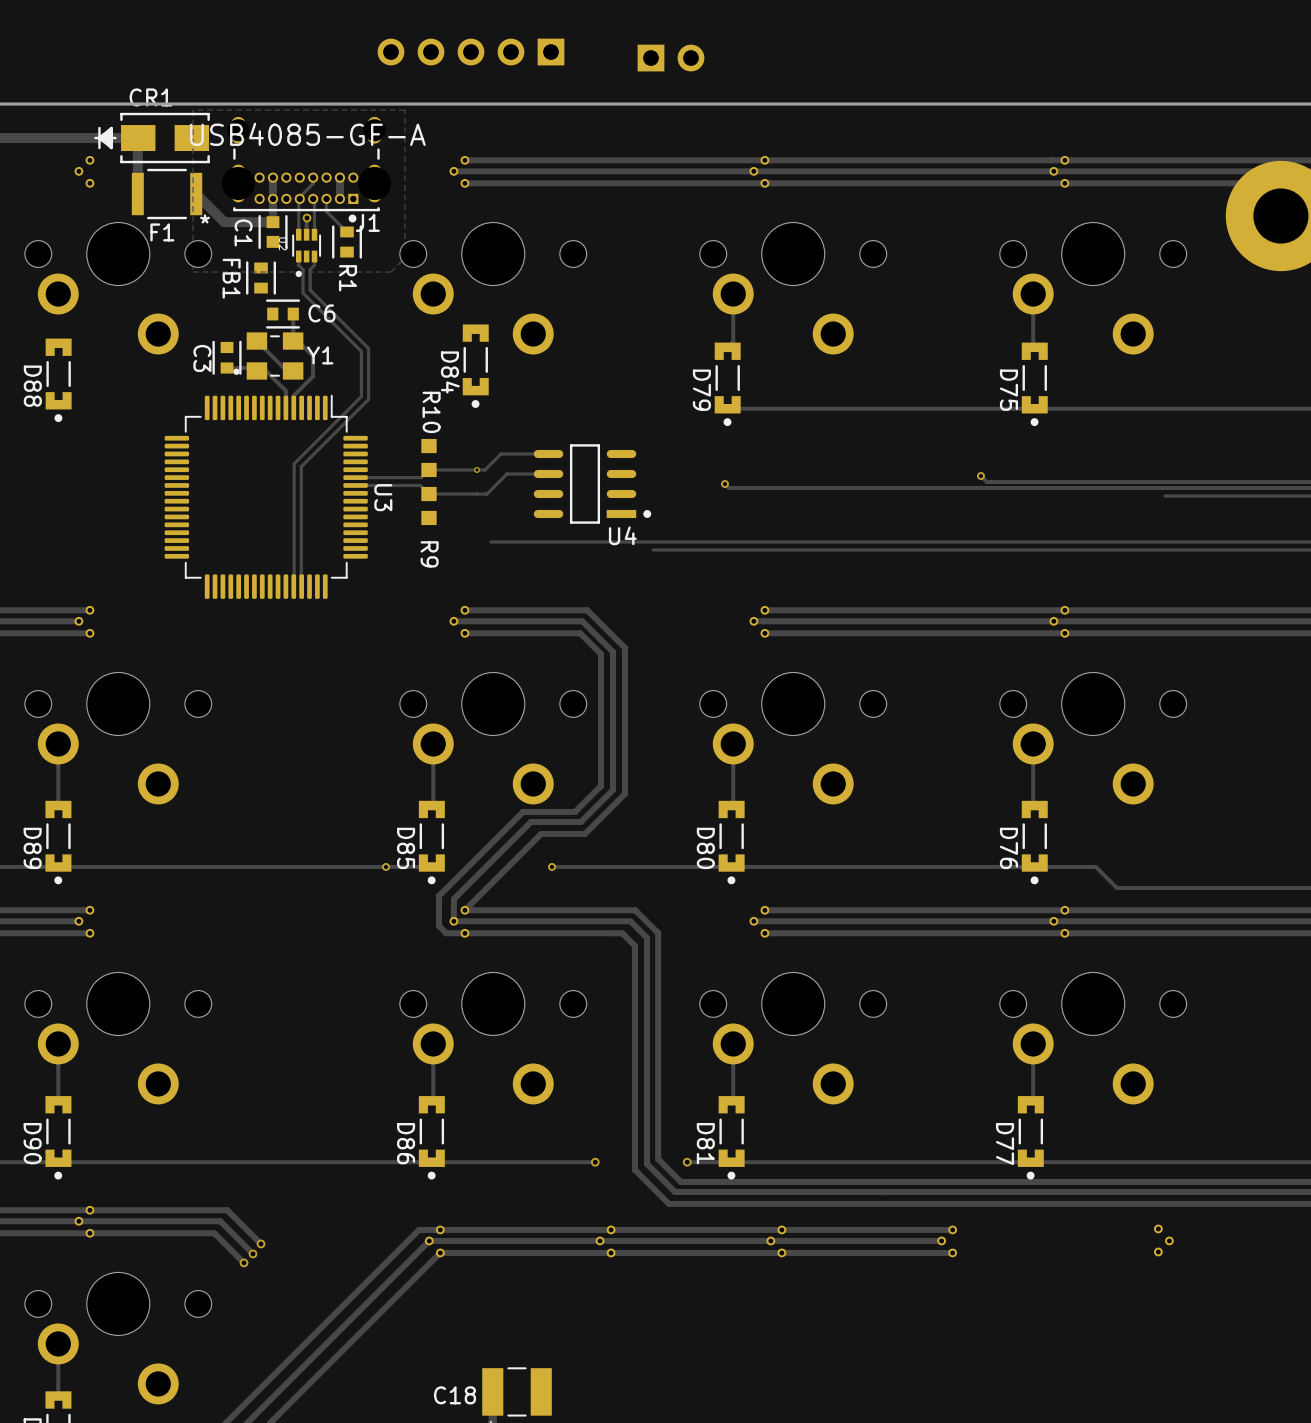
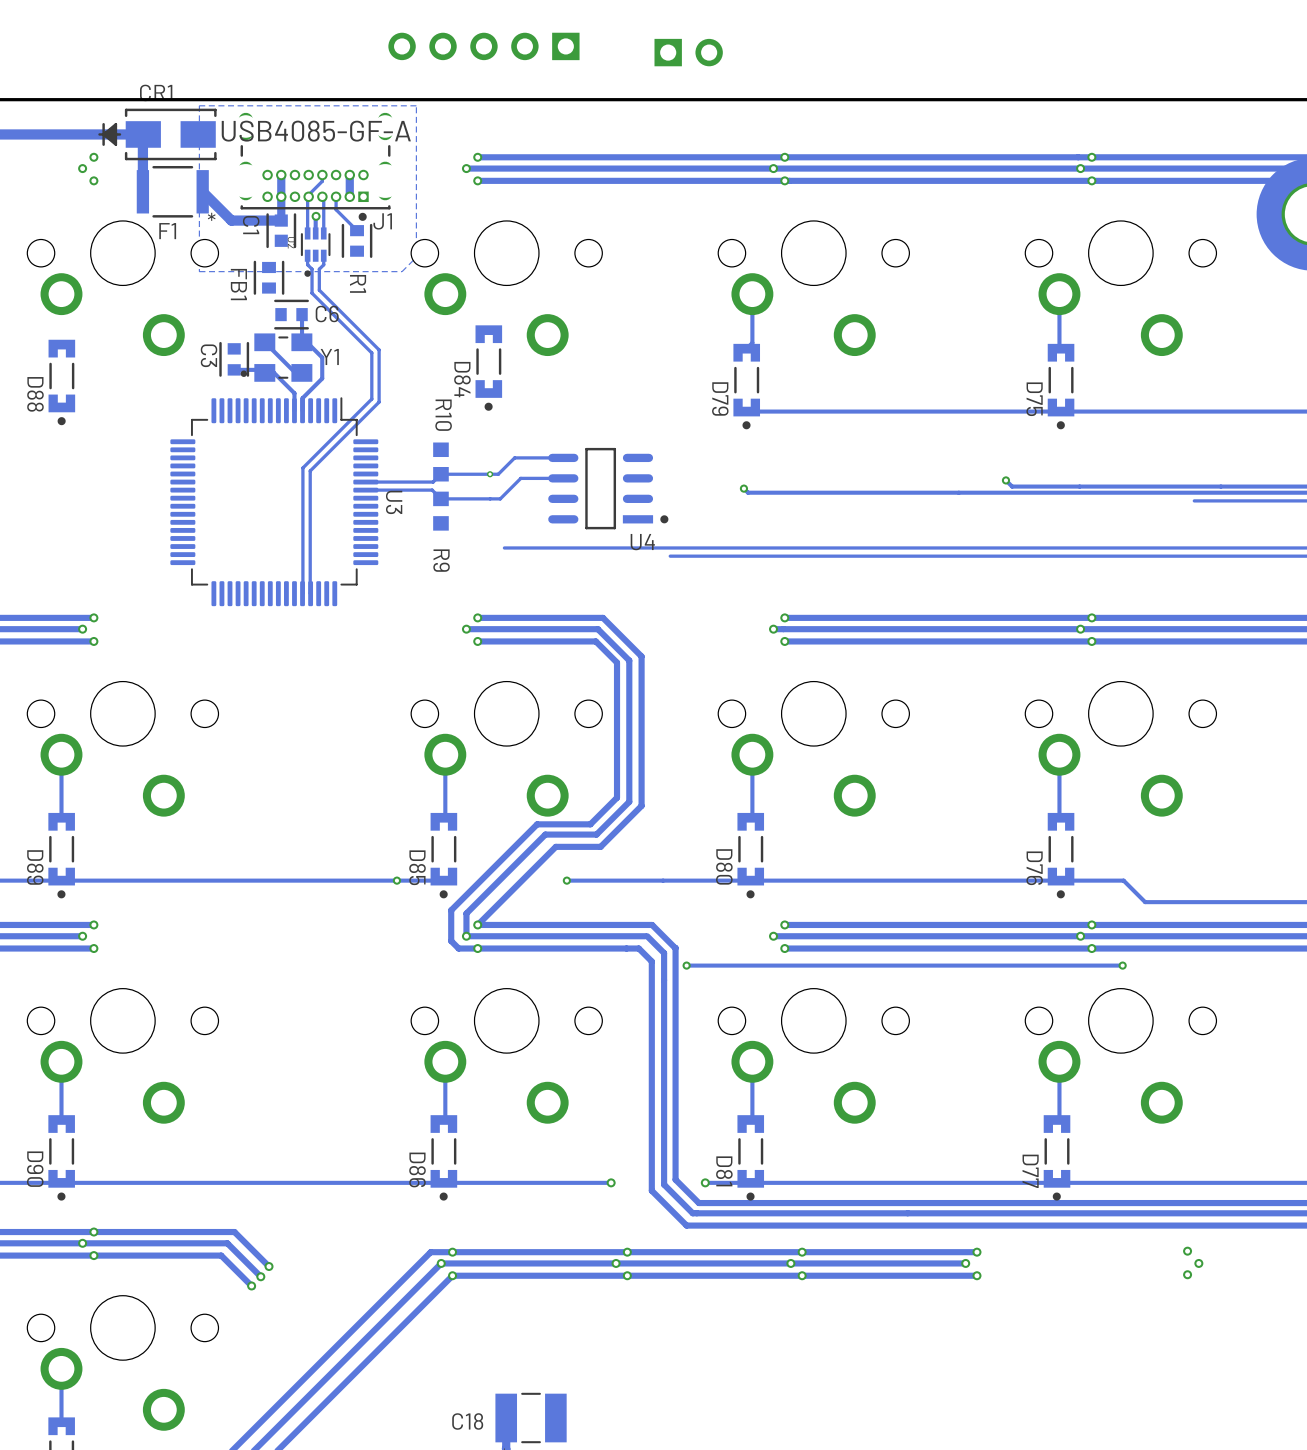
via: none -> (686, 965)
track: none -> (1122, 965) (686, 965)
via: none -> (1122, 965)

